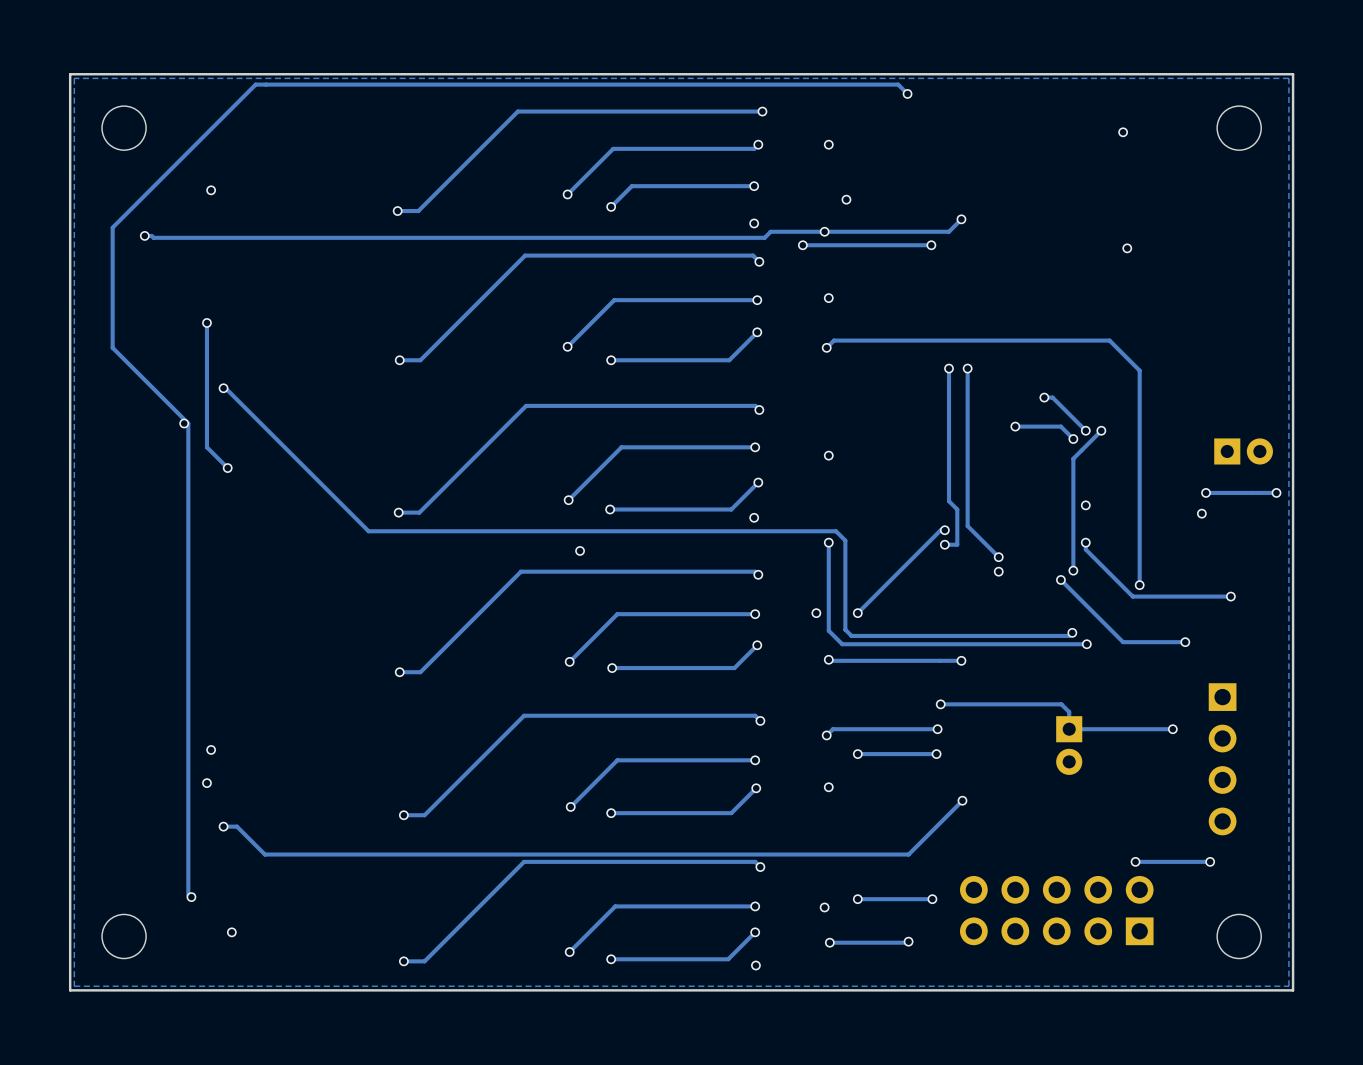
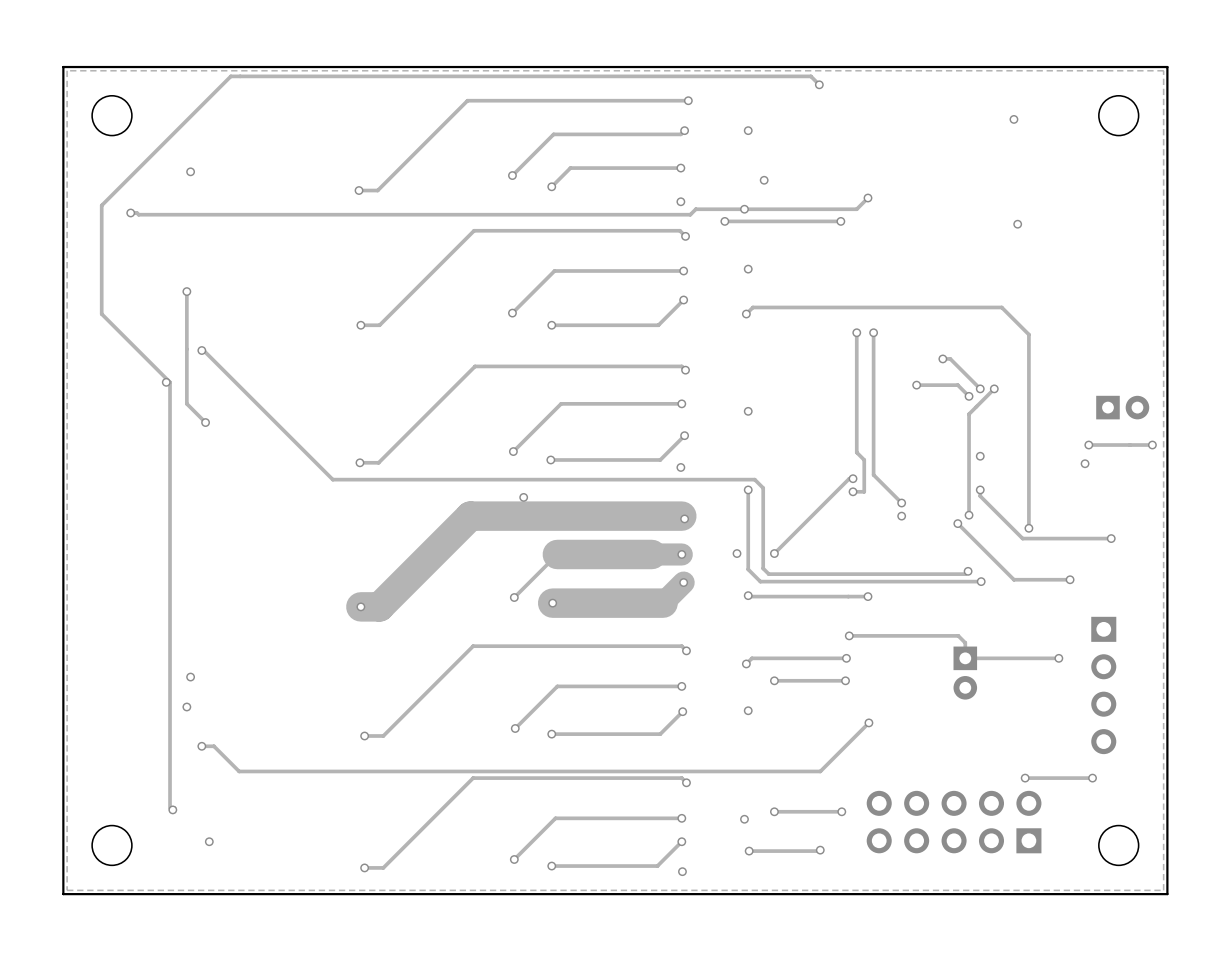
track width: thin (755, 571) (520, 571) (420, 672) (399, 672) -> thick (681, 516) (470, 516) (379, 606) (360, 606)
track width: thin (755, 614) (617, 614) -> thick (681, 554) (557, 554)
track width: thin (757, 645) (734, 668) (612, 668) -> thick (683, 582) (663, 603) (552, 603)

